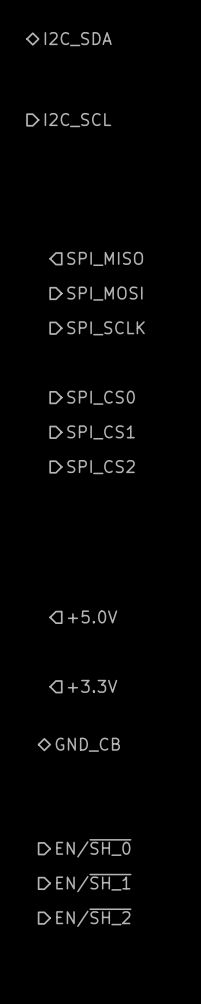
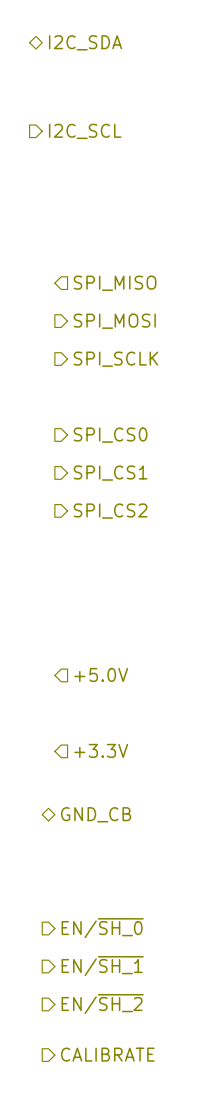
hierarchical label: none -> CALIBRATE (107, 1054)

